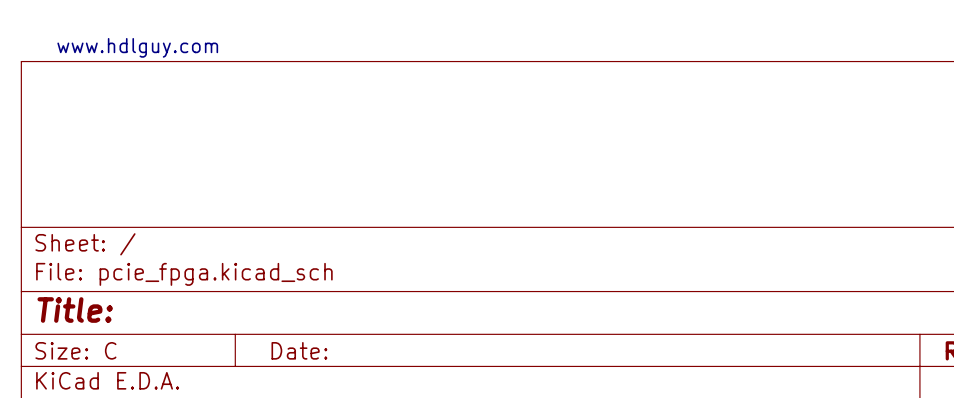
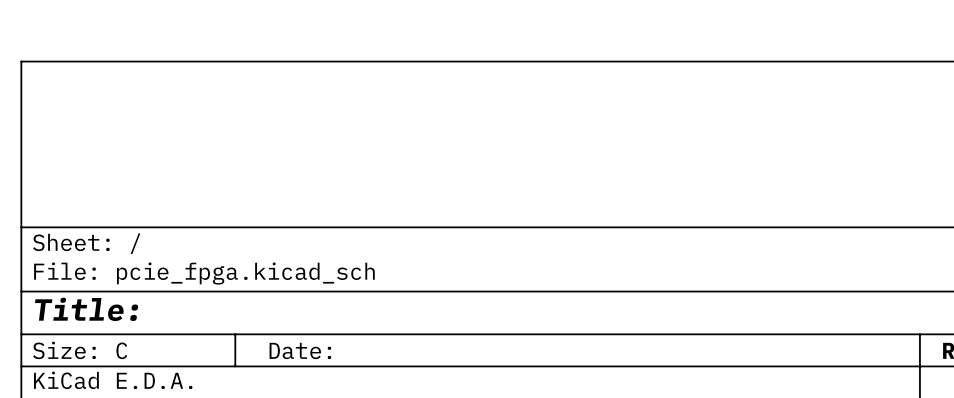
text: www.hdlguy.com (137, 47) -> none

